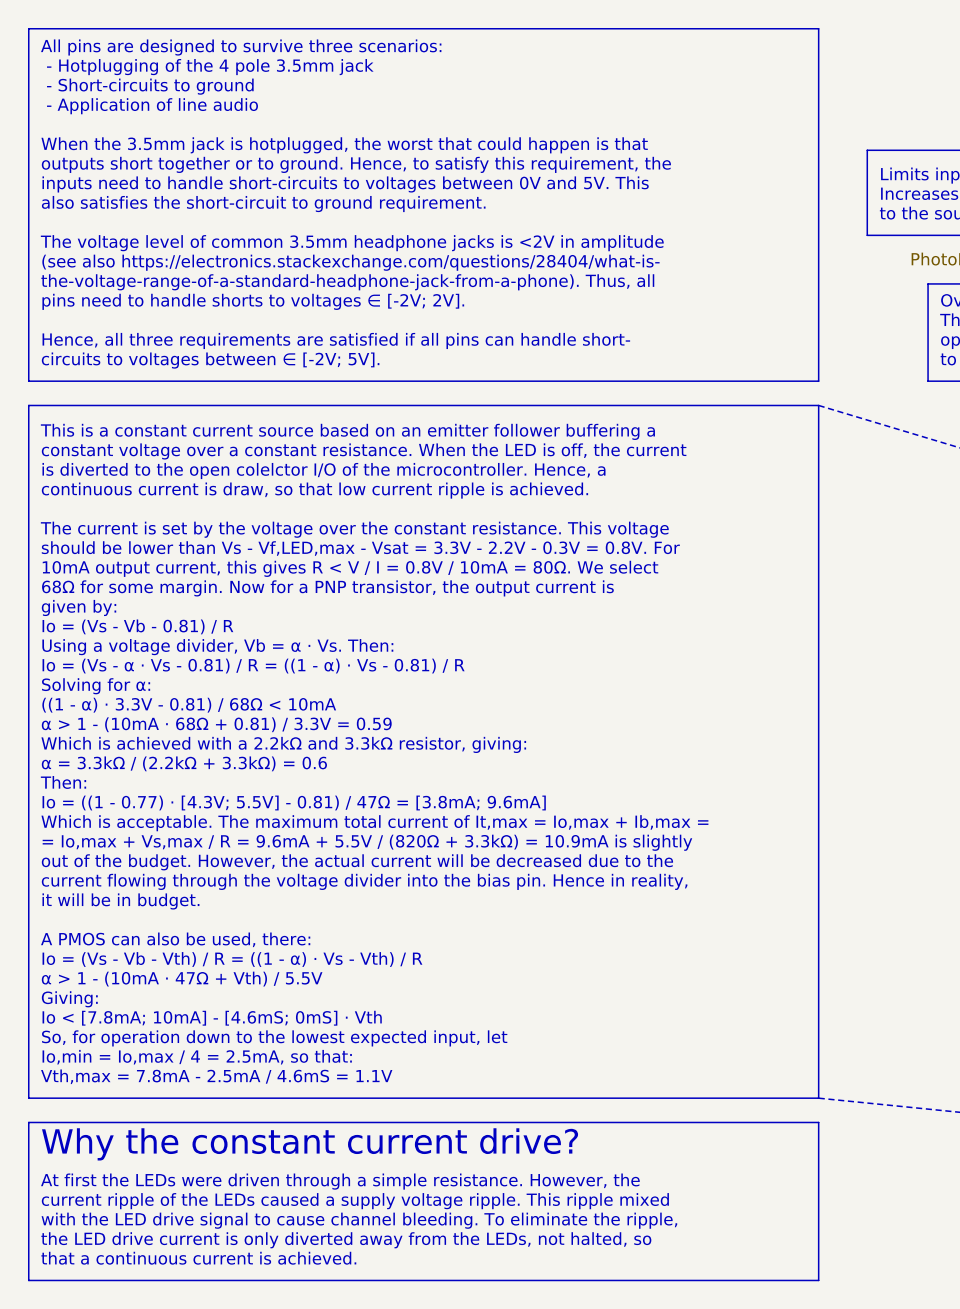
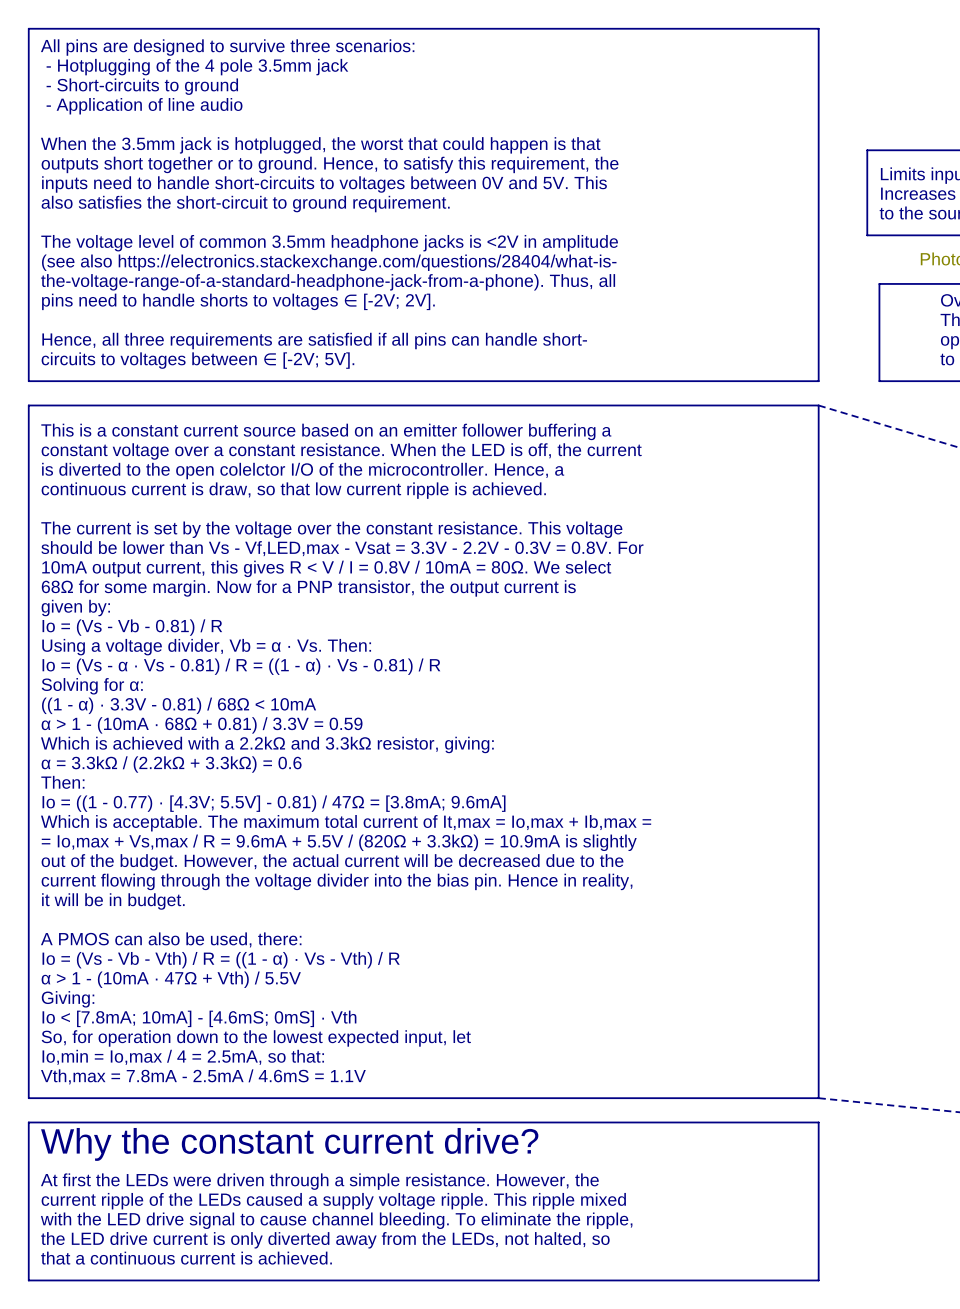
bus: (928, 283) (928, 381) -> (928, 283) (879, 283) (879, 381) (928, 381)

